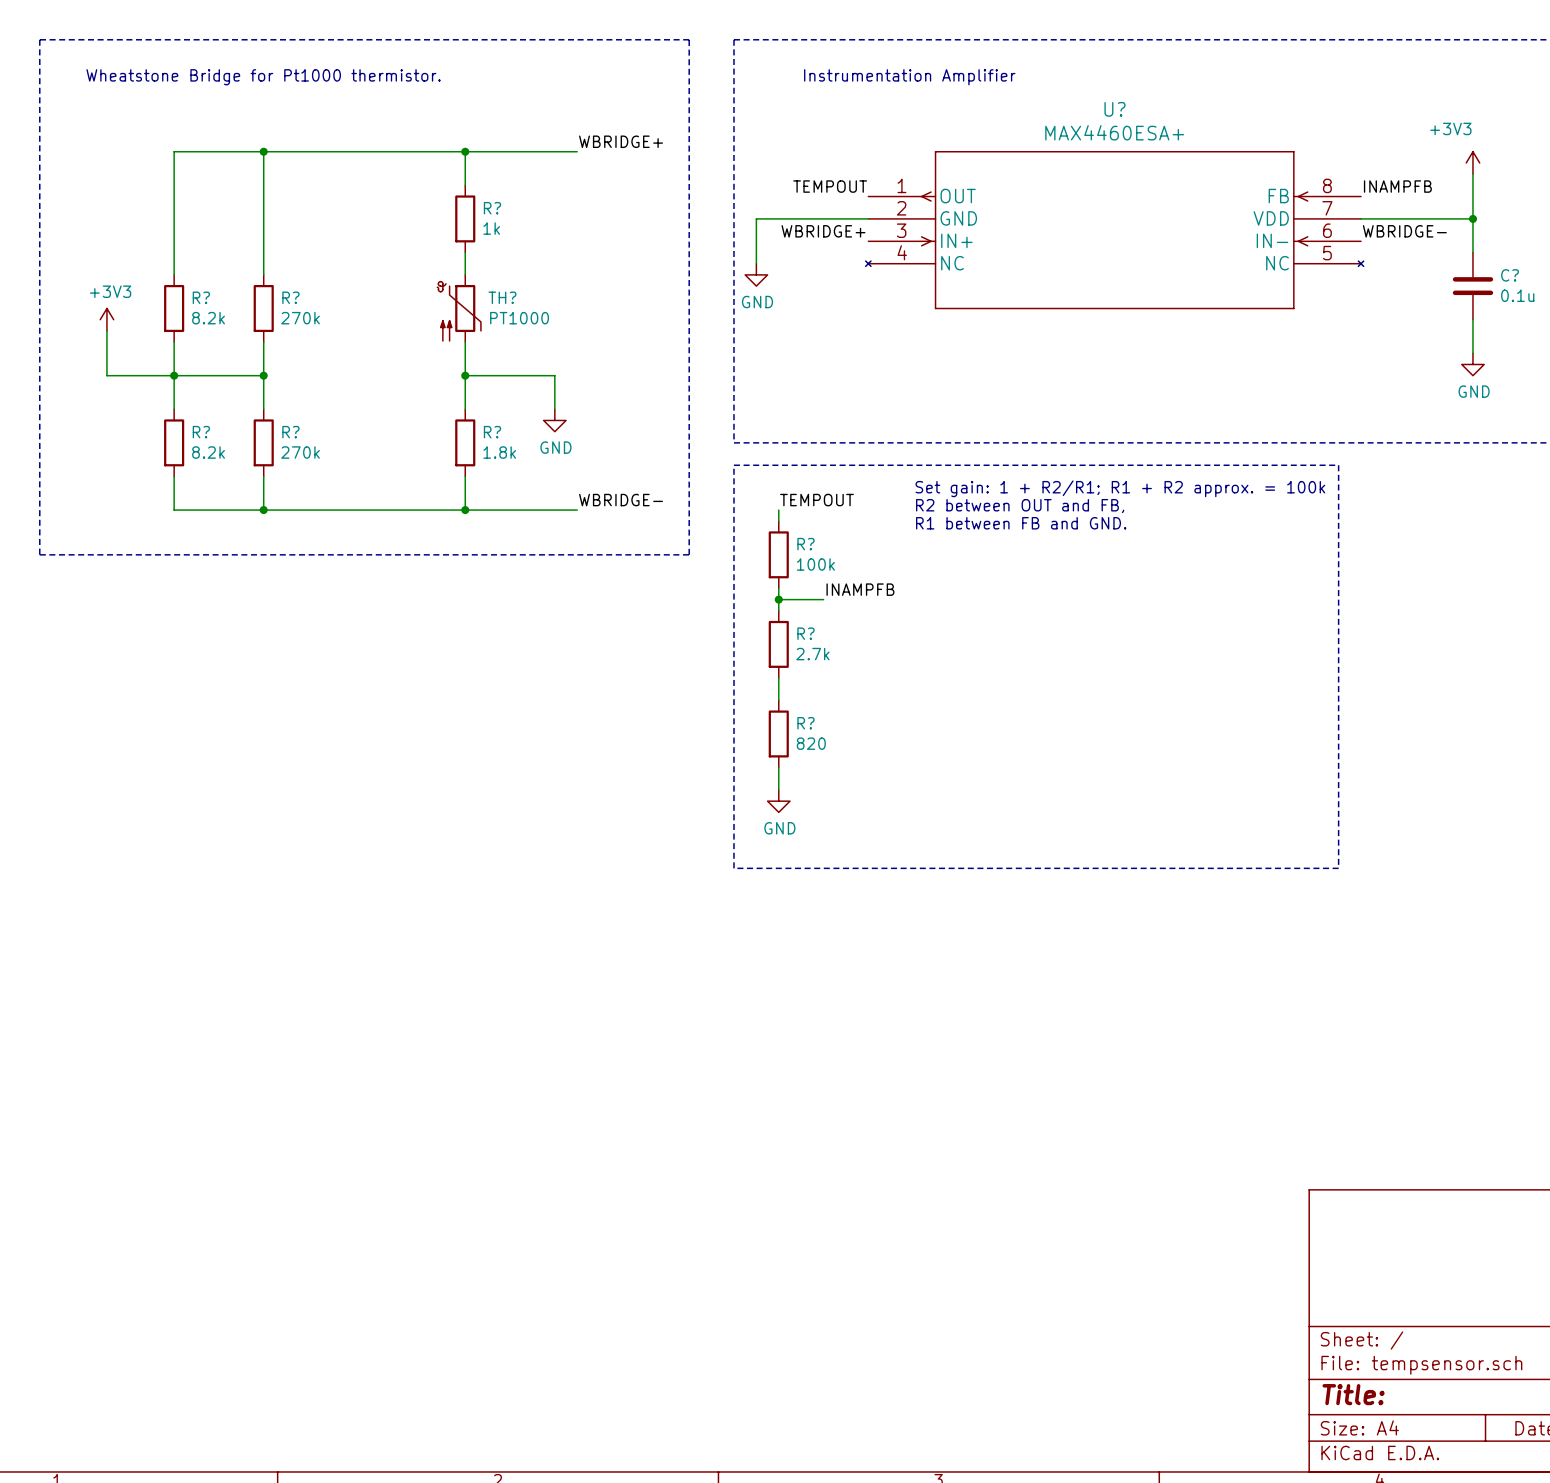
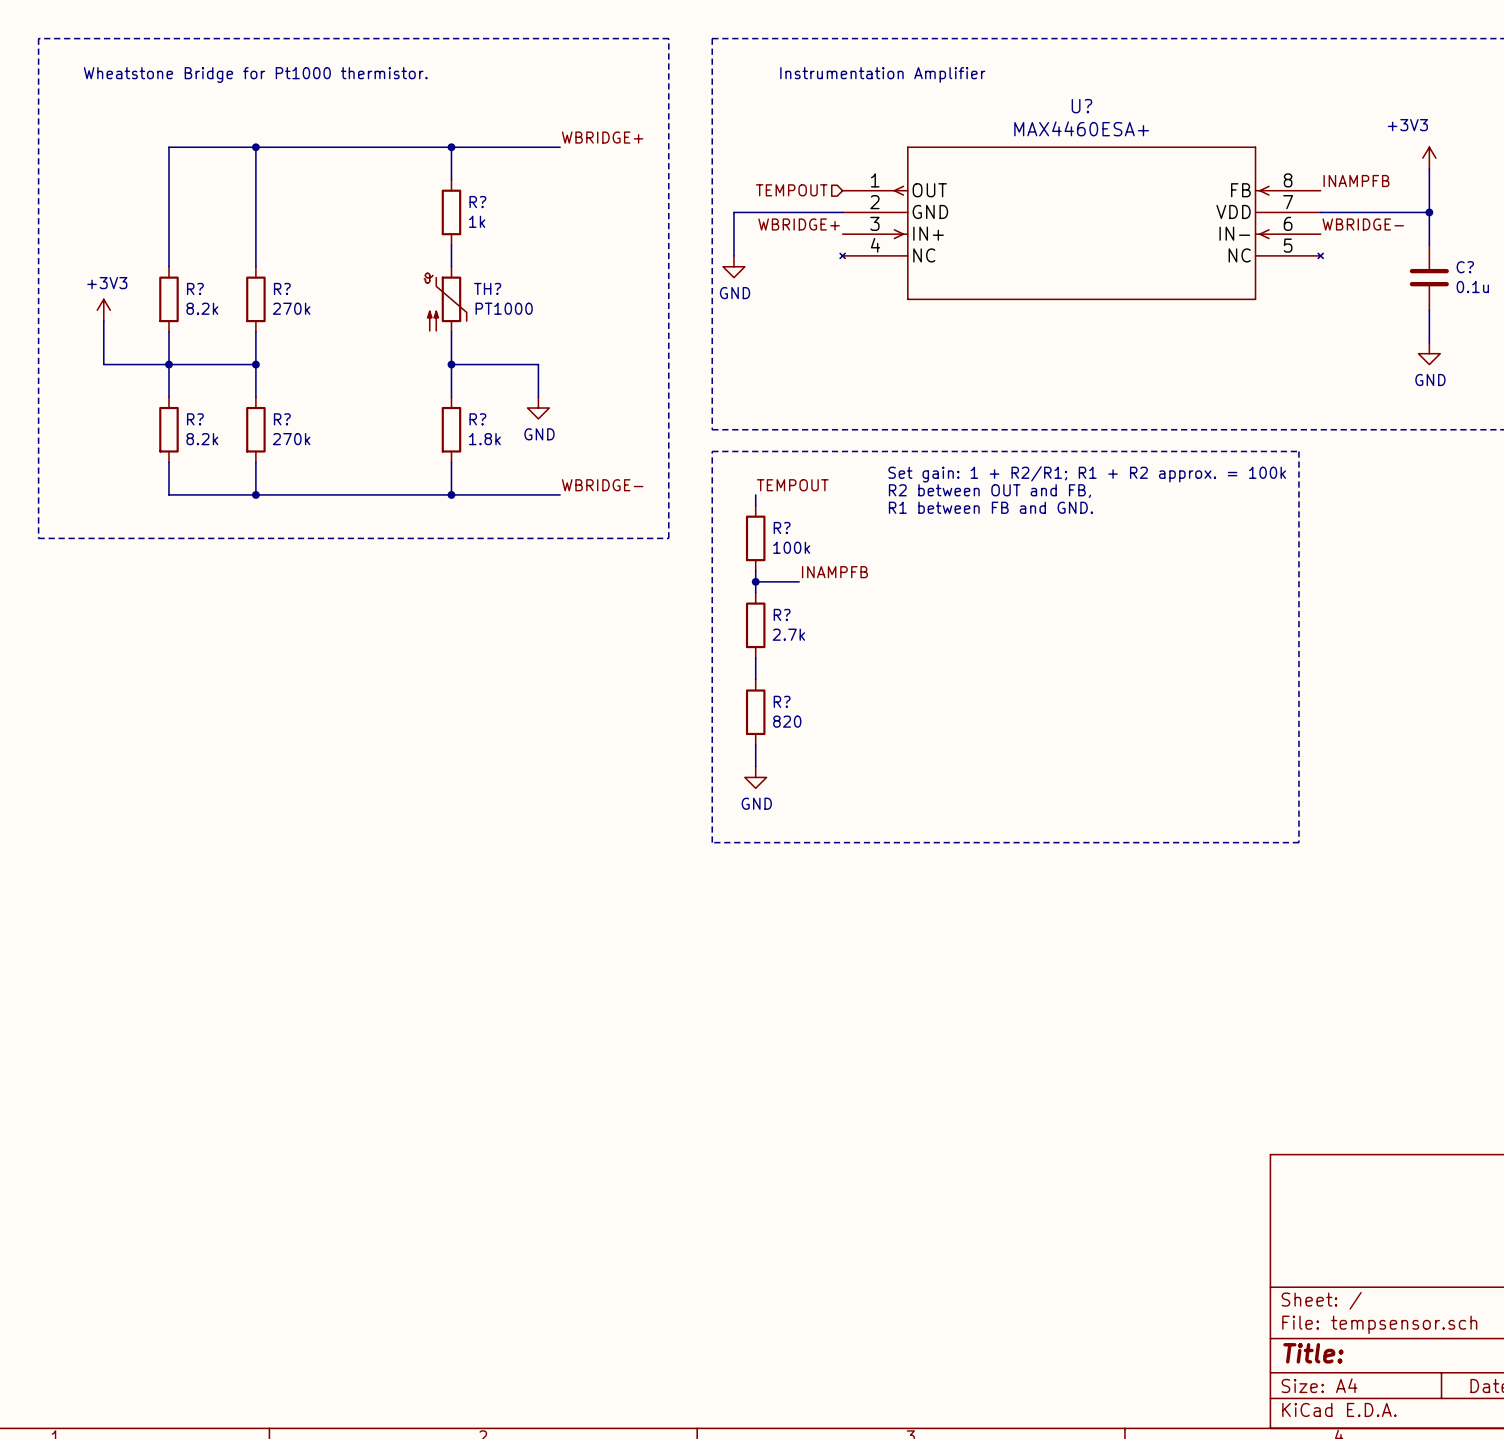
label: TEMPOUT (830, 186) -> none
hierarchical label: none -> TEMPOUT (791, 190)

